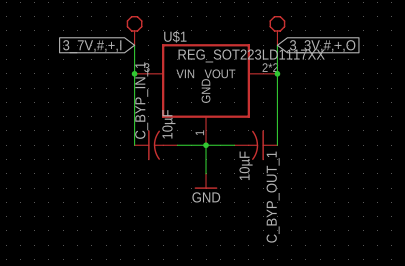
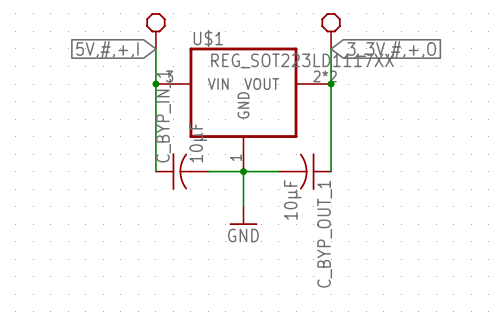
global label: 3_7V,#,+,I (92, 46) -> 5V,#,+,I (107, 49)

